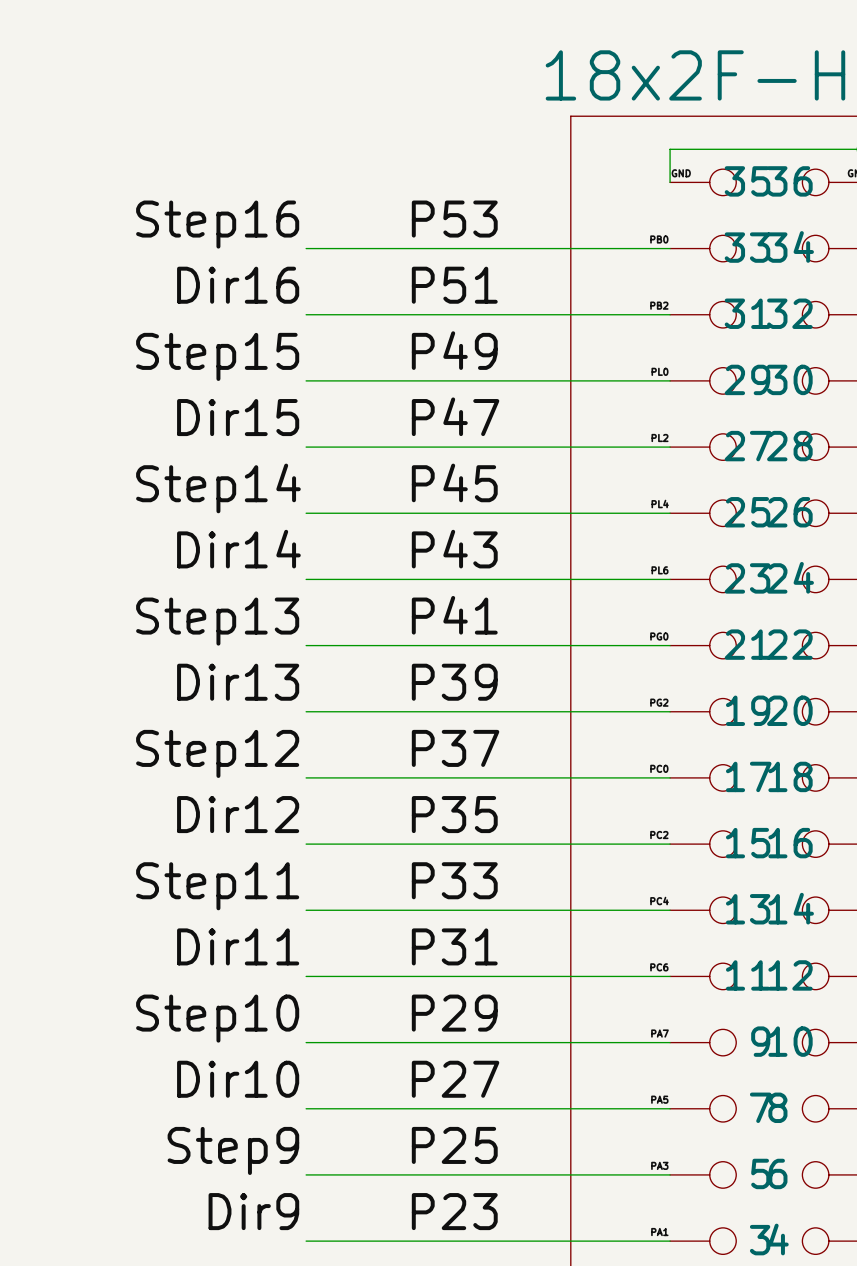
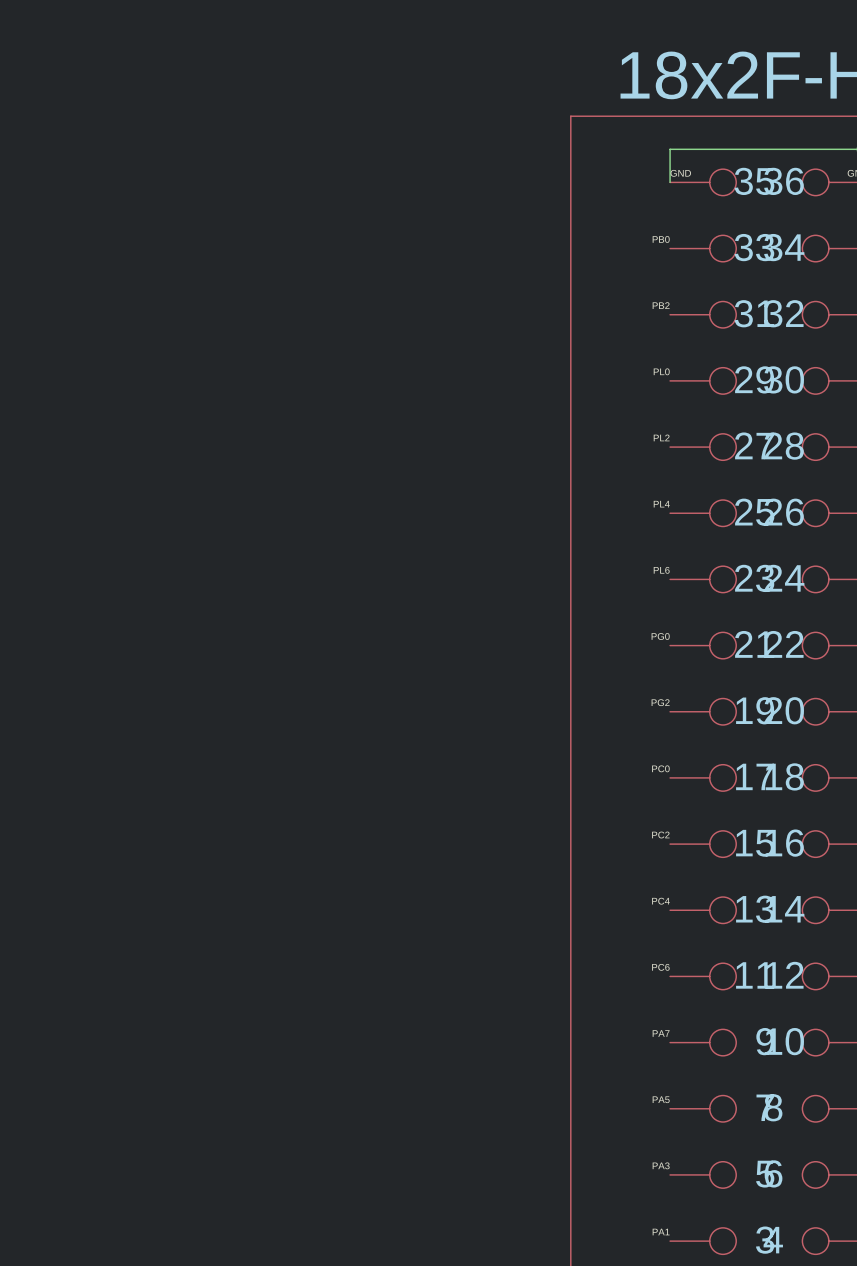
label: P53 (454, 219) -> none
label: Step16 (217, 224) -> none
wire: (306, 248) (670, 248) -> none
label: Dir16 (238, 285) -> none
label: P51 (454, 285) -> none
wire: (306, 314) (670, 314) -> none
label: P49 (454, 350) -> none
label: Step15 (217, 356) -> none
wire: (306, 380) (670, 380) -> none
label: P47 (455, 416) -> none
label: Dir15 (238, 417) -> none
wire: (306, 447) (670, 447) -> none
label: P45 (454, 482) -> none
label: Step14 (218, 488) -> none
wire: (306, 513) (670, 513) -> none
label: Dir14 (238, 549) -> none
label: P43 (454, 549) -> none
wire: (306, 579) (670, 579) -> none
label: P41 (454, 615) -> none
label: Step13 (217, 621) -> none
wire: (306, 645) (670, 645) -> none
label: Dir13 (238, 682) -> none
label: P39 (454, 682) -> none
wire: (306, 711) (670, 711) -> none
label: P37 (455, 748) -> none
label: Step12 (217, 753) -> none
wire: (306, 777) (670, 777) -> none
label: Dir12 (238, 814) -> none
label: P35 (454, 814) -> none
wire: (306, 844) (670, 844) -> none
label: P33 (454, 880) -> none
label: Step11 (217, 886) -> none
wire: (306, 910) (670, 910) -> none
label: Dir11 (238, 946) -> none
label: P31 (454, 946) -> none
wire: (306, 976) (670, 976) -> none
label: P29 (454, 1013) -> none
label: Step10 (217, 1018) -> none
wire: (306, 1042) (670, 1042) -> none
label: Dir10 (238, 1079) -> none
label: P27 (455, 1079) -> none
wire: (306, 1108) (670, 1108) -> none
label: P25 (454, 1145) -> none
label: Step9 (233, 1150) -> none
wire: (306, 1174) (670, 1174) -> none
label: Dir9 (253, 1211) -> none
label: P23 (454, 1211) -> none
wire: (306, 1241) (670, 1241) -> none

